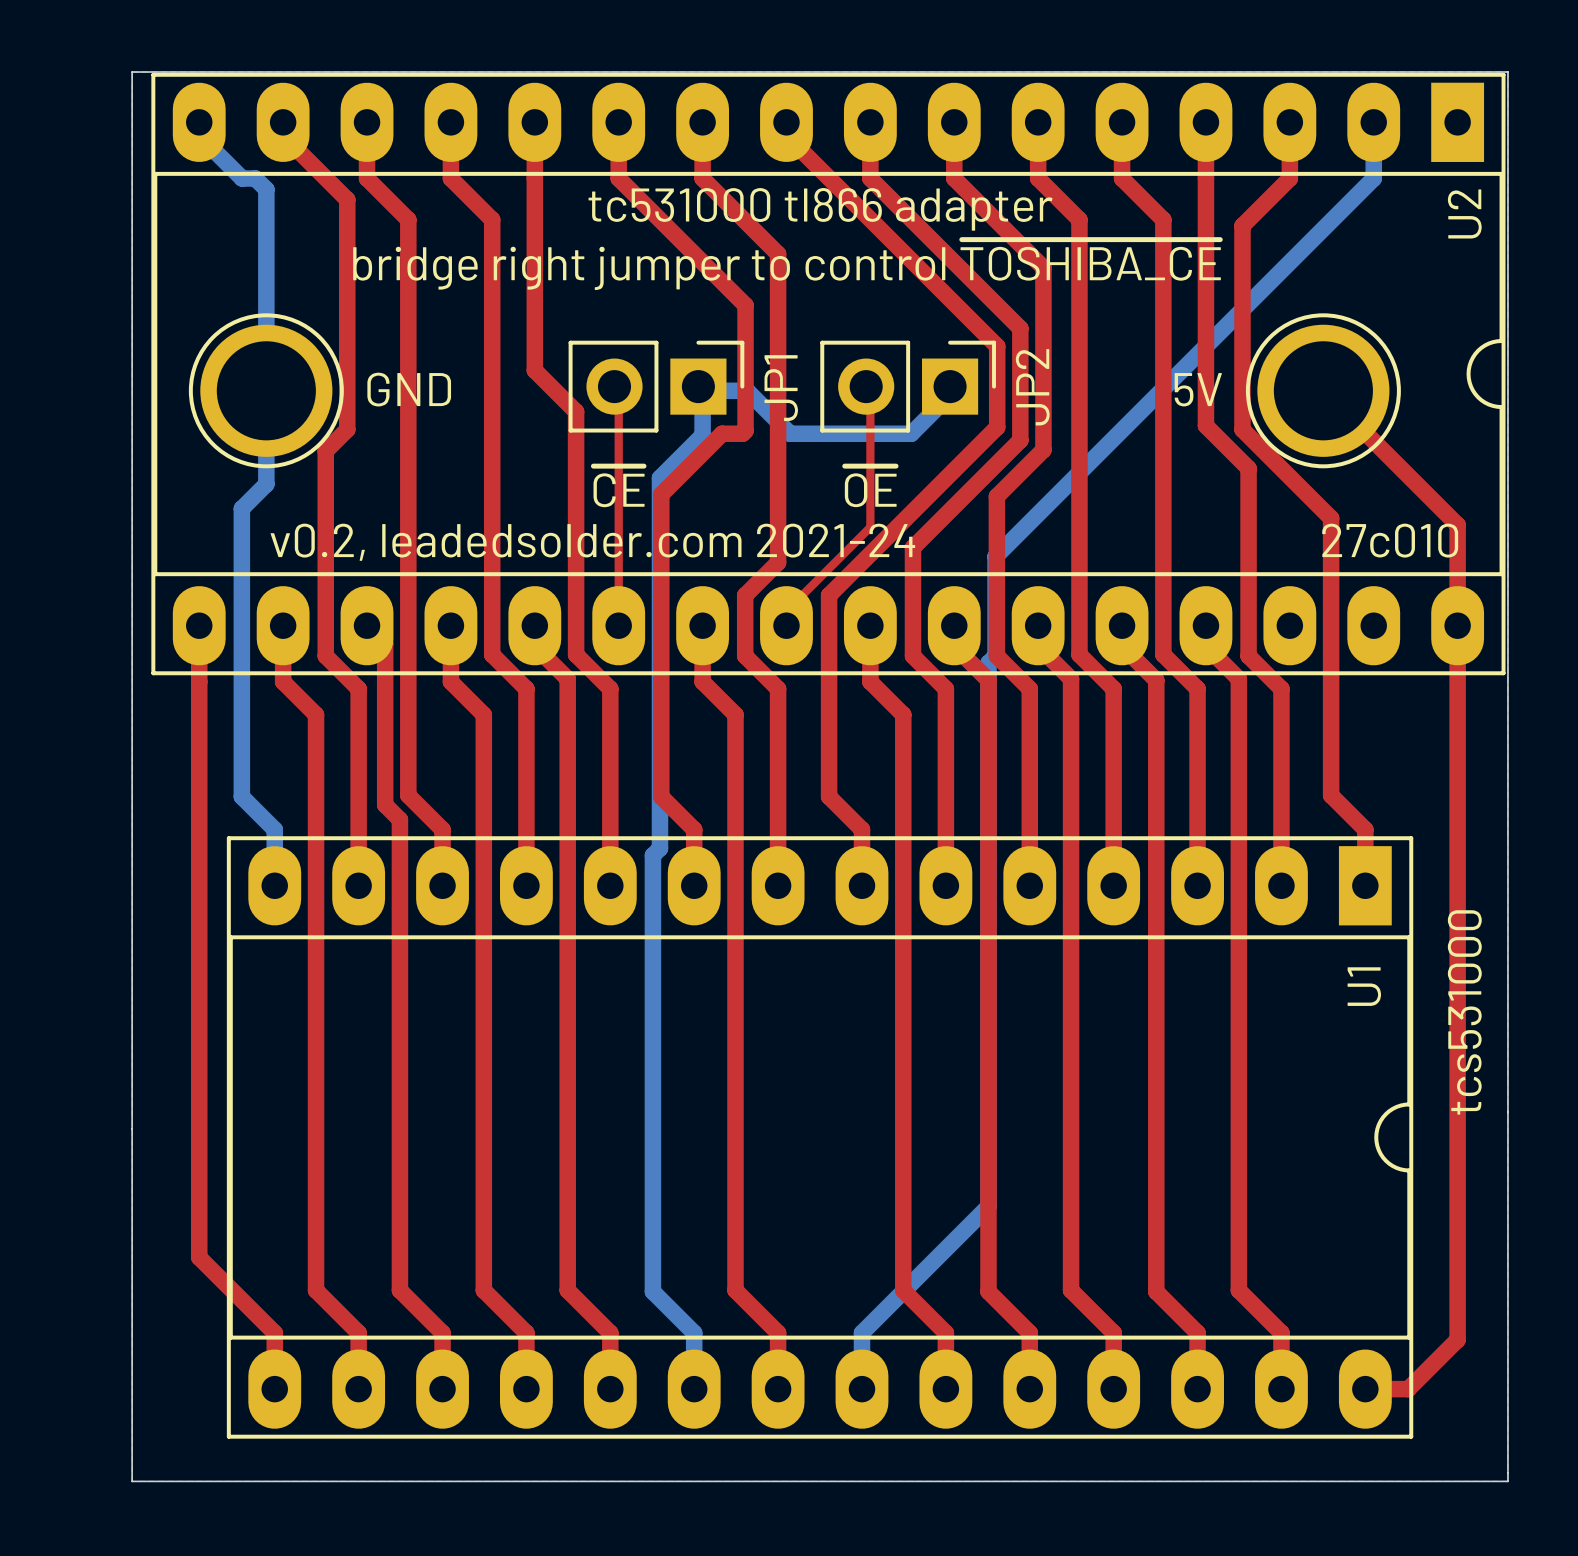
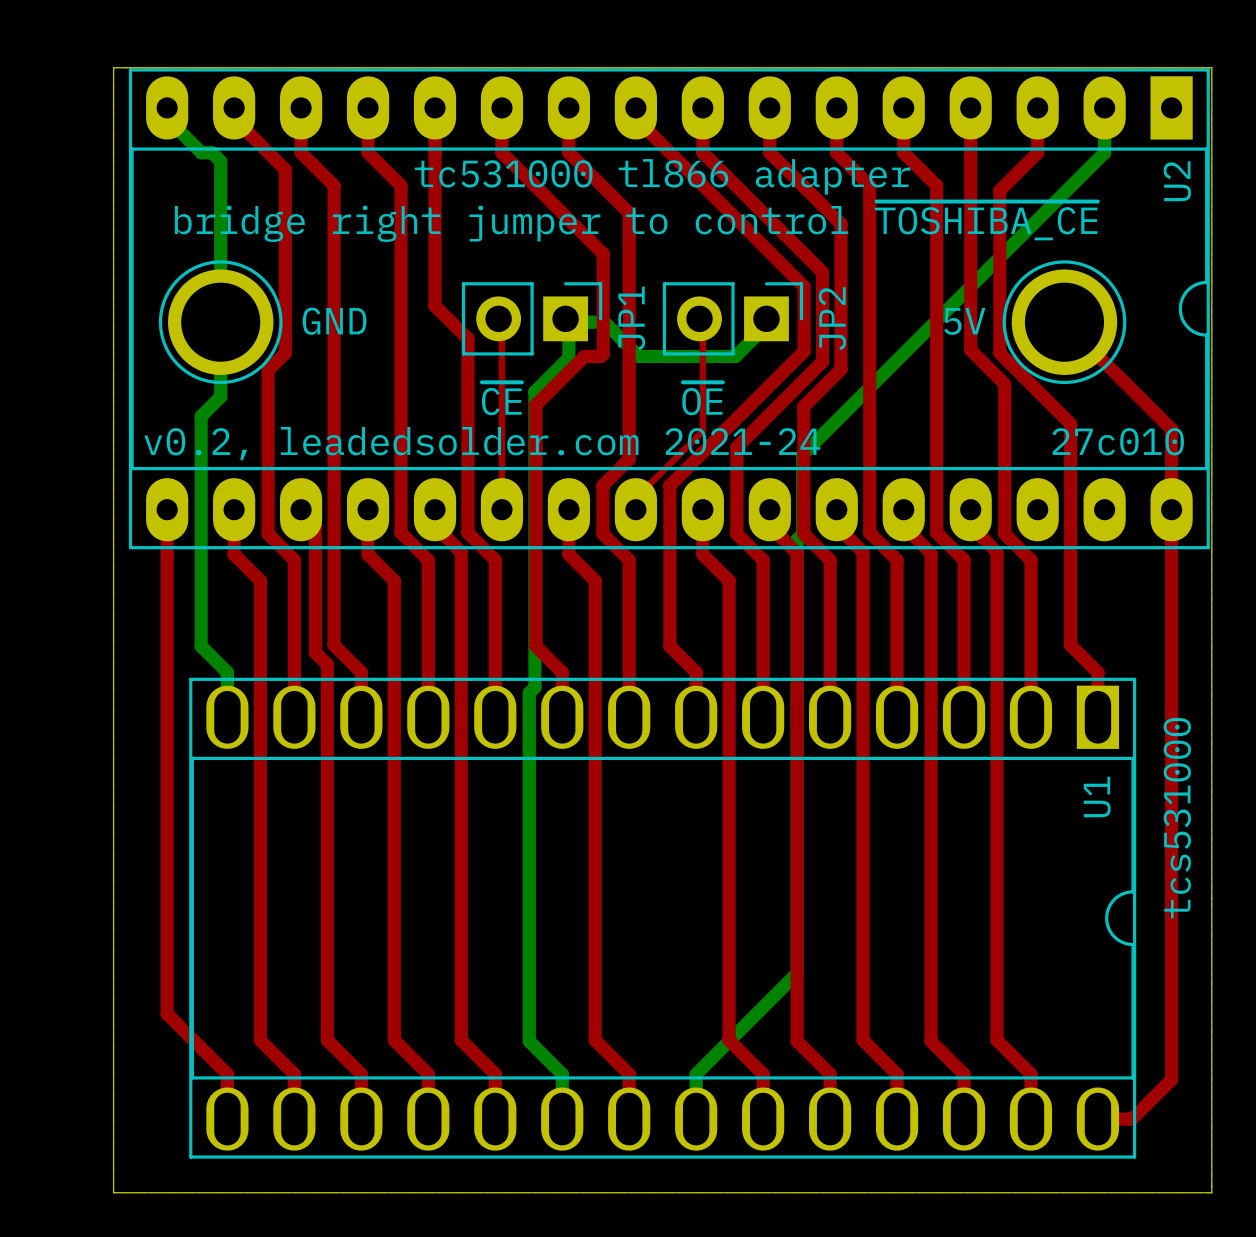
U1 footprint: [226, 836, 1414, 1439] -> [189, 677, 1137, 1159]

